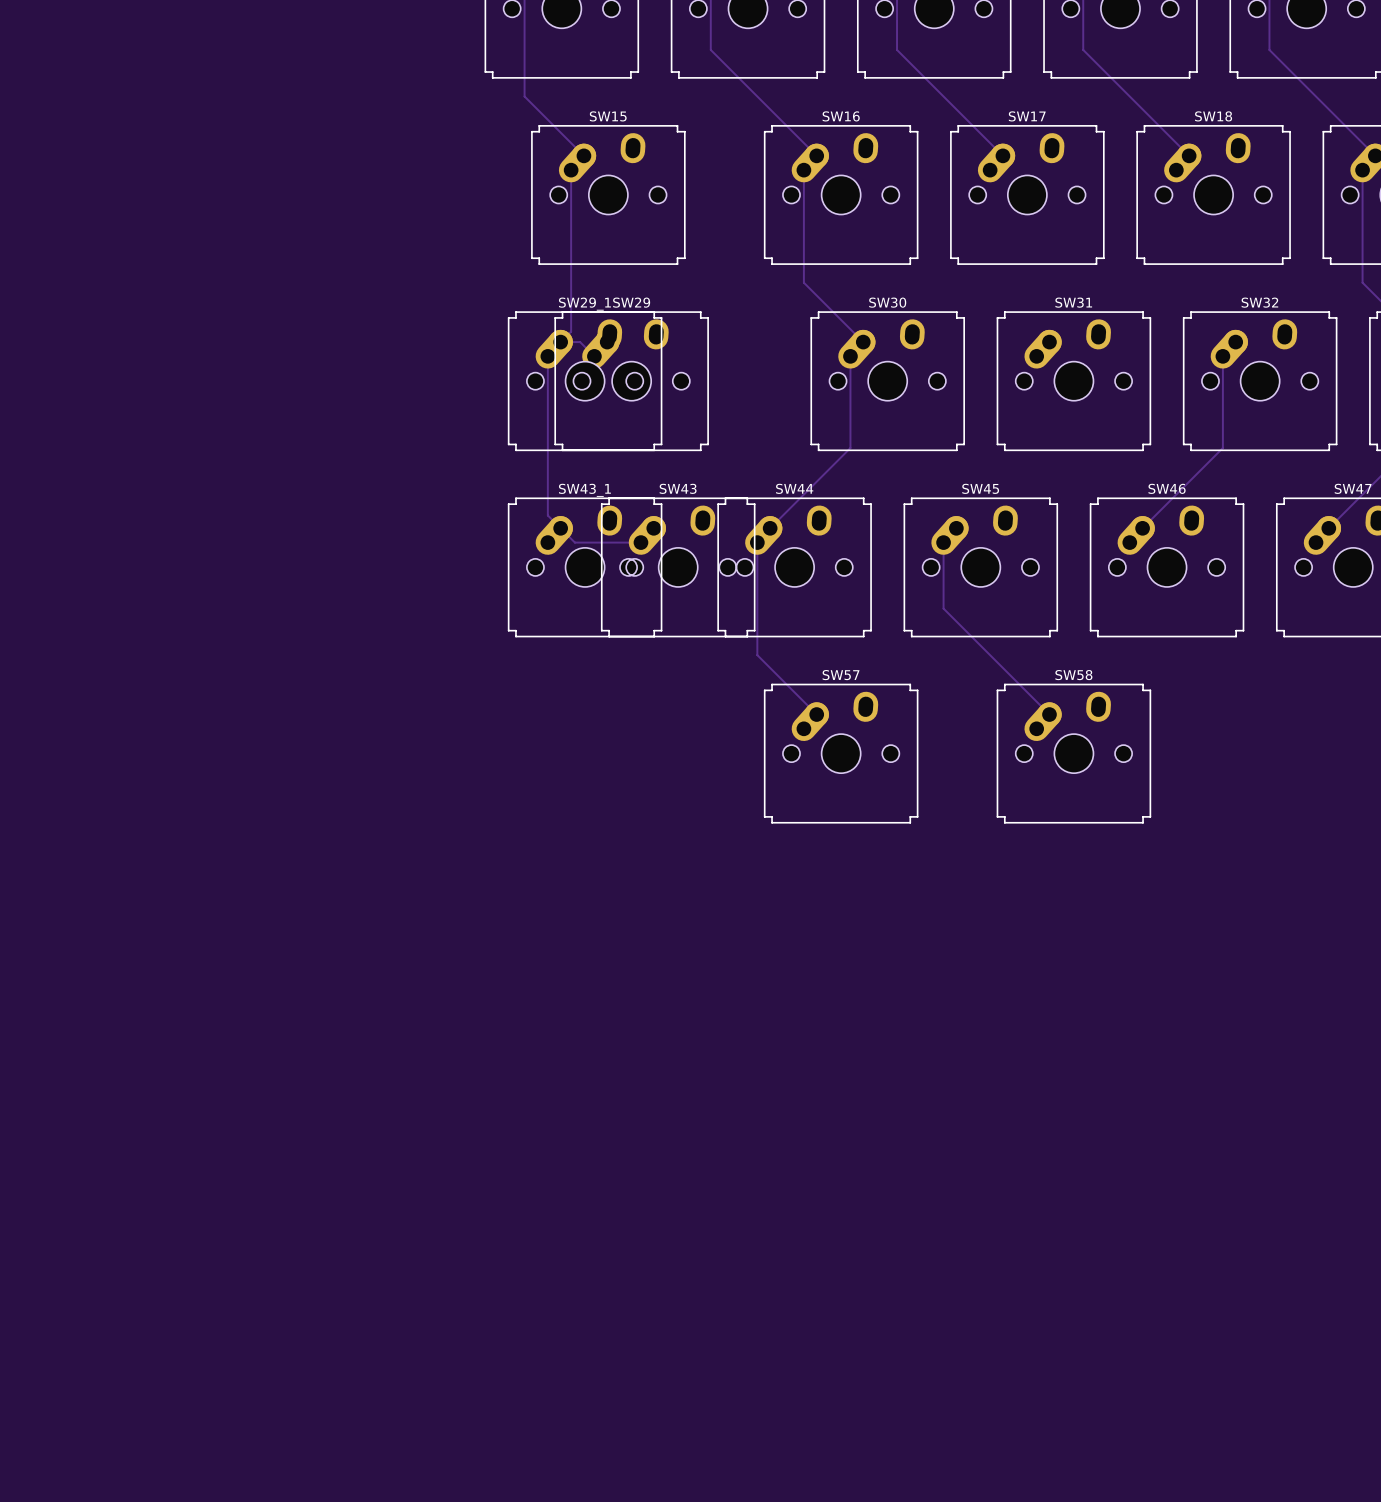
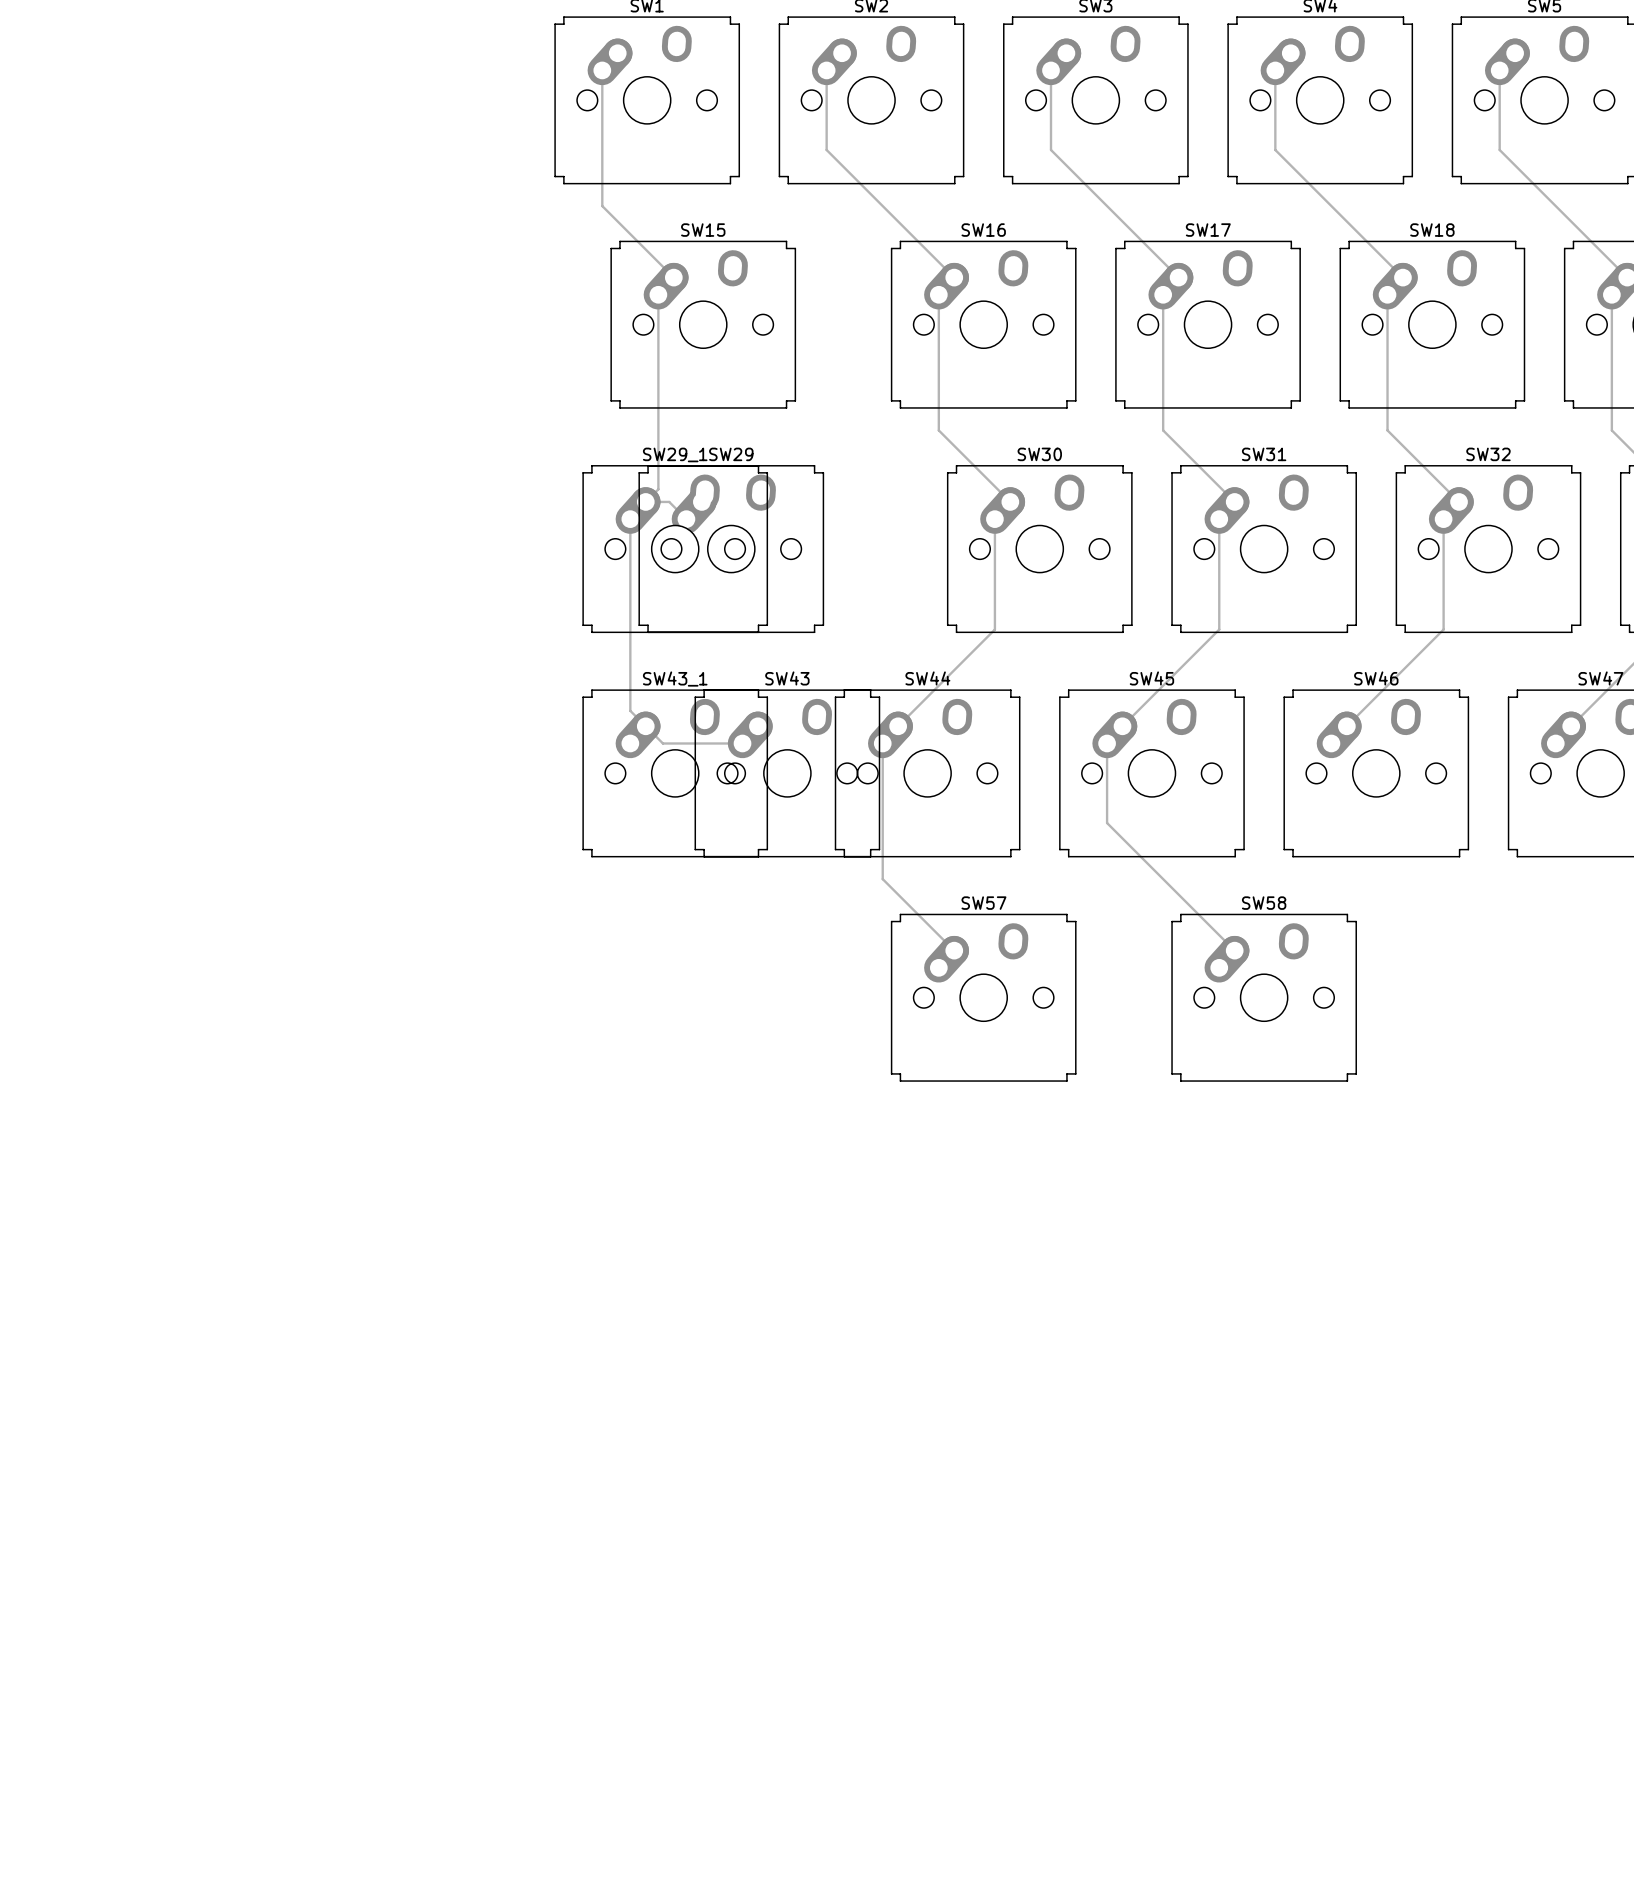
track: none -> (1163, 294) (1163, 430) (1234, 501)
track: none -> (1387, 294) (1387, 430) (1459, 501)
track: none -> (1219, 519) (1219, 629) (1122, 726)

